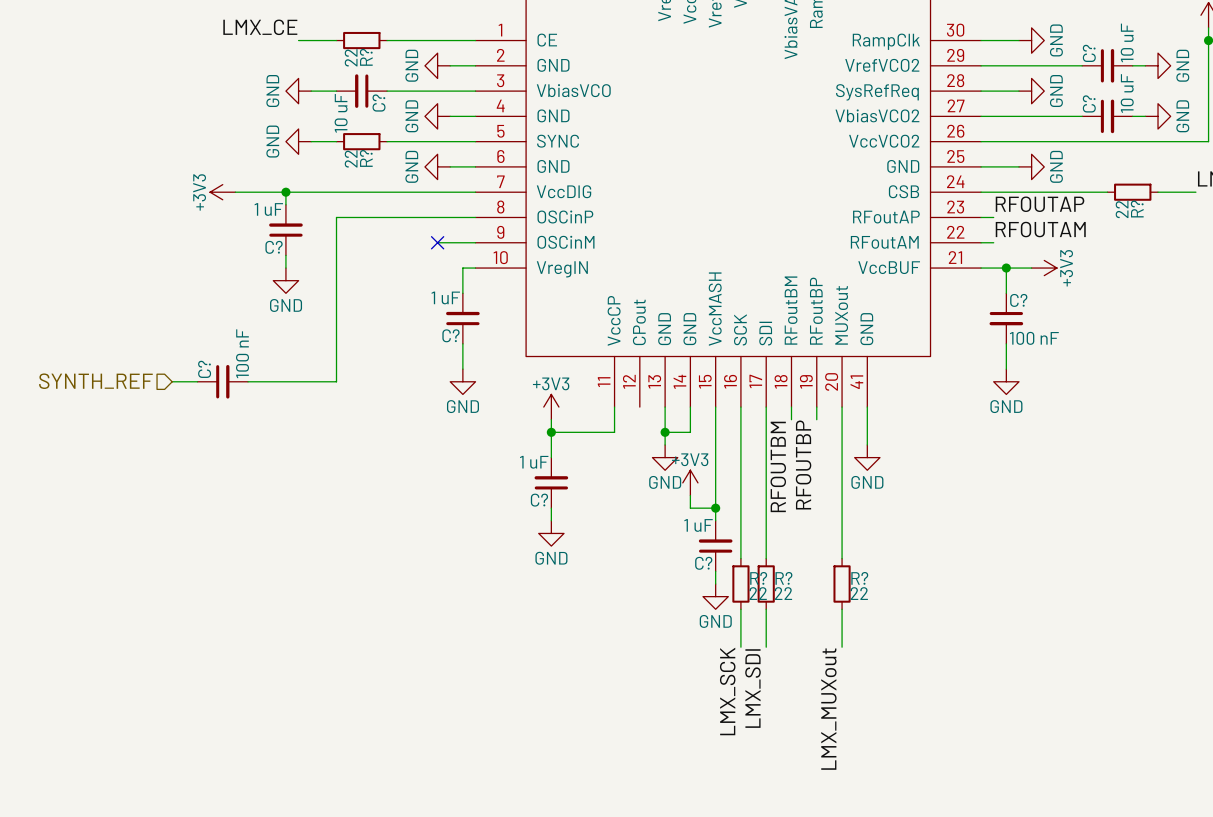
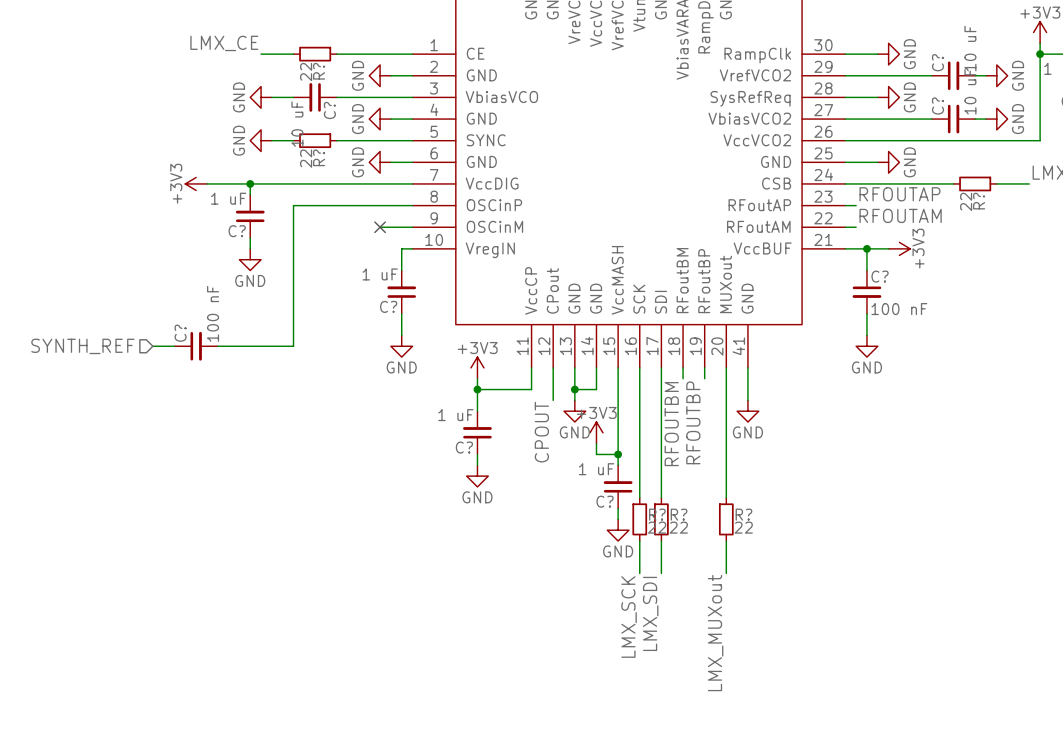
wire: none -> (553, 367) (553, 400)
label: none -> CPOUT (541, 432)

